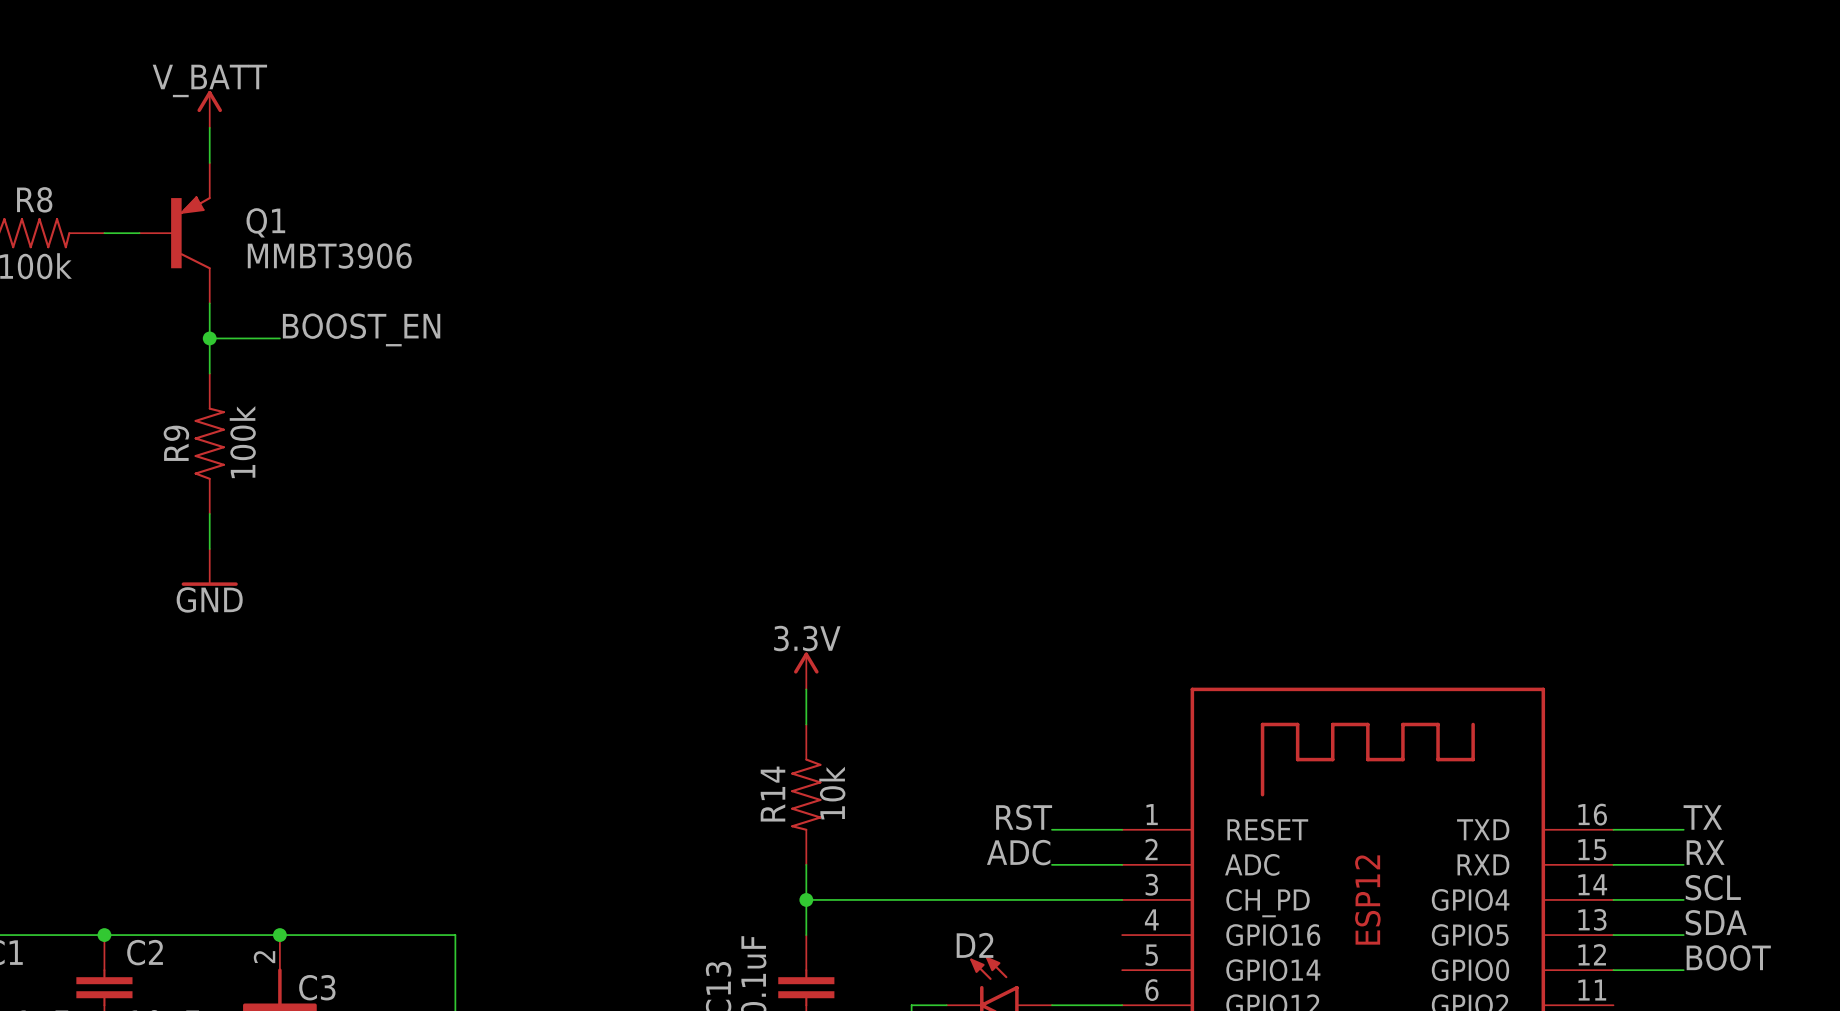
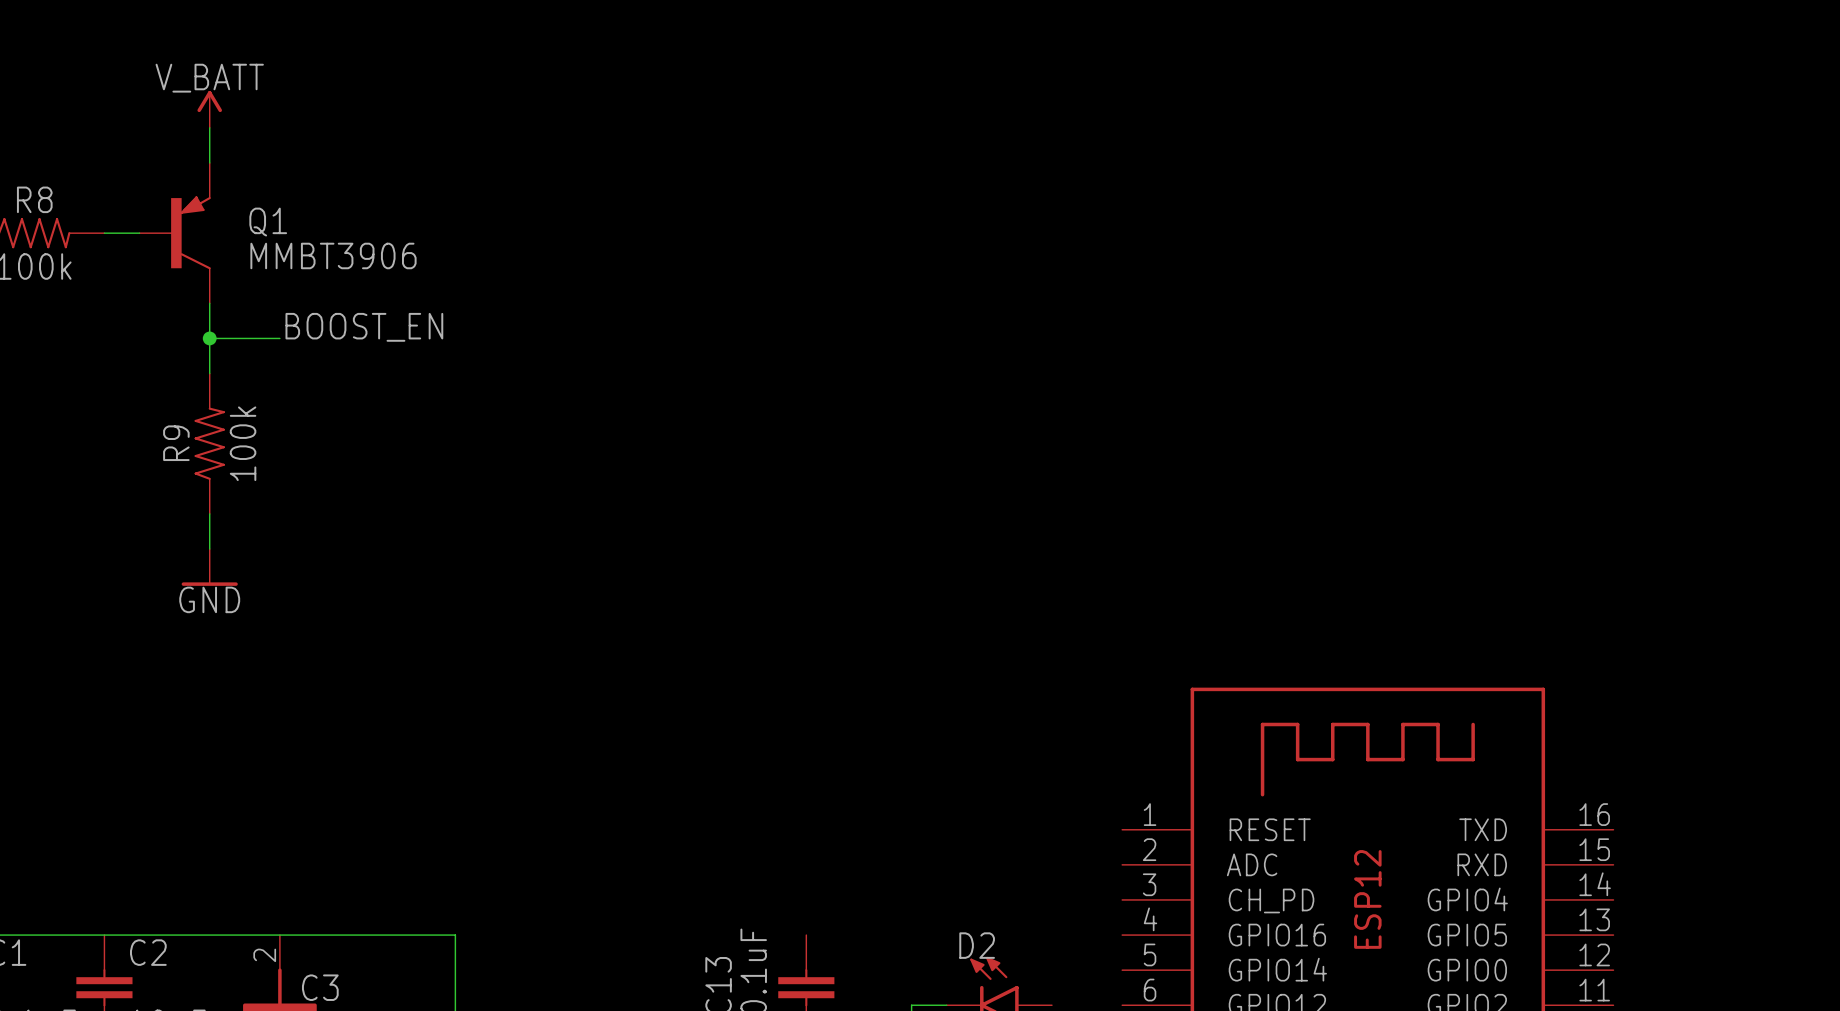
power symbol: 3.3V (806, 670) -> none
wire: (806, 689) (806, 724) -> none
R14: 10k (806, 794) -> none
label: RST (1024, 817) -> none
label: TX (1702, 817) -> none
wire: (1051, 829) (1122, 829) -> none
wire: (1613, 829) (1683, 829) -> none
label: ADC (1018, 852) -> none
label: RX (1705, 852) -> none
wire: (806, 864) (806, 935) -> none
wire: (1051, 864) (1122, 864) -> none
wire: (1613, 864) (1683, 864) -> none
label: SCL (1713, 887) -> none
wire: (806, 899) (1122, 899) -> none
junction: (806, 899) -> none
wire: (1613, 899) (1683, 899) -> none
label: SDA (1716, 922) -> none
junction: (104, 935) -> none
junction: (279, 935) -> none
wire: (1613, 935) (1683, 935) -> none
label: BOOT (1728, 957) -> none
wire: (1613, 970) (1683, 970) -> none
wire: (1051, 1005) (1122, 1005) -> none

